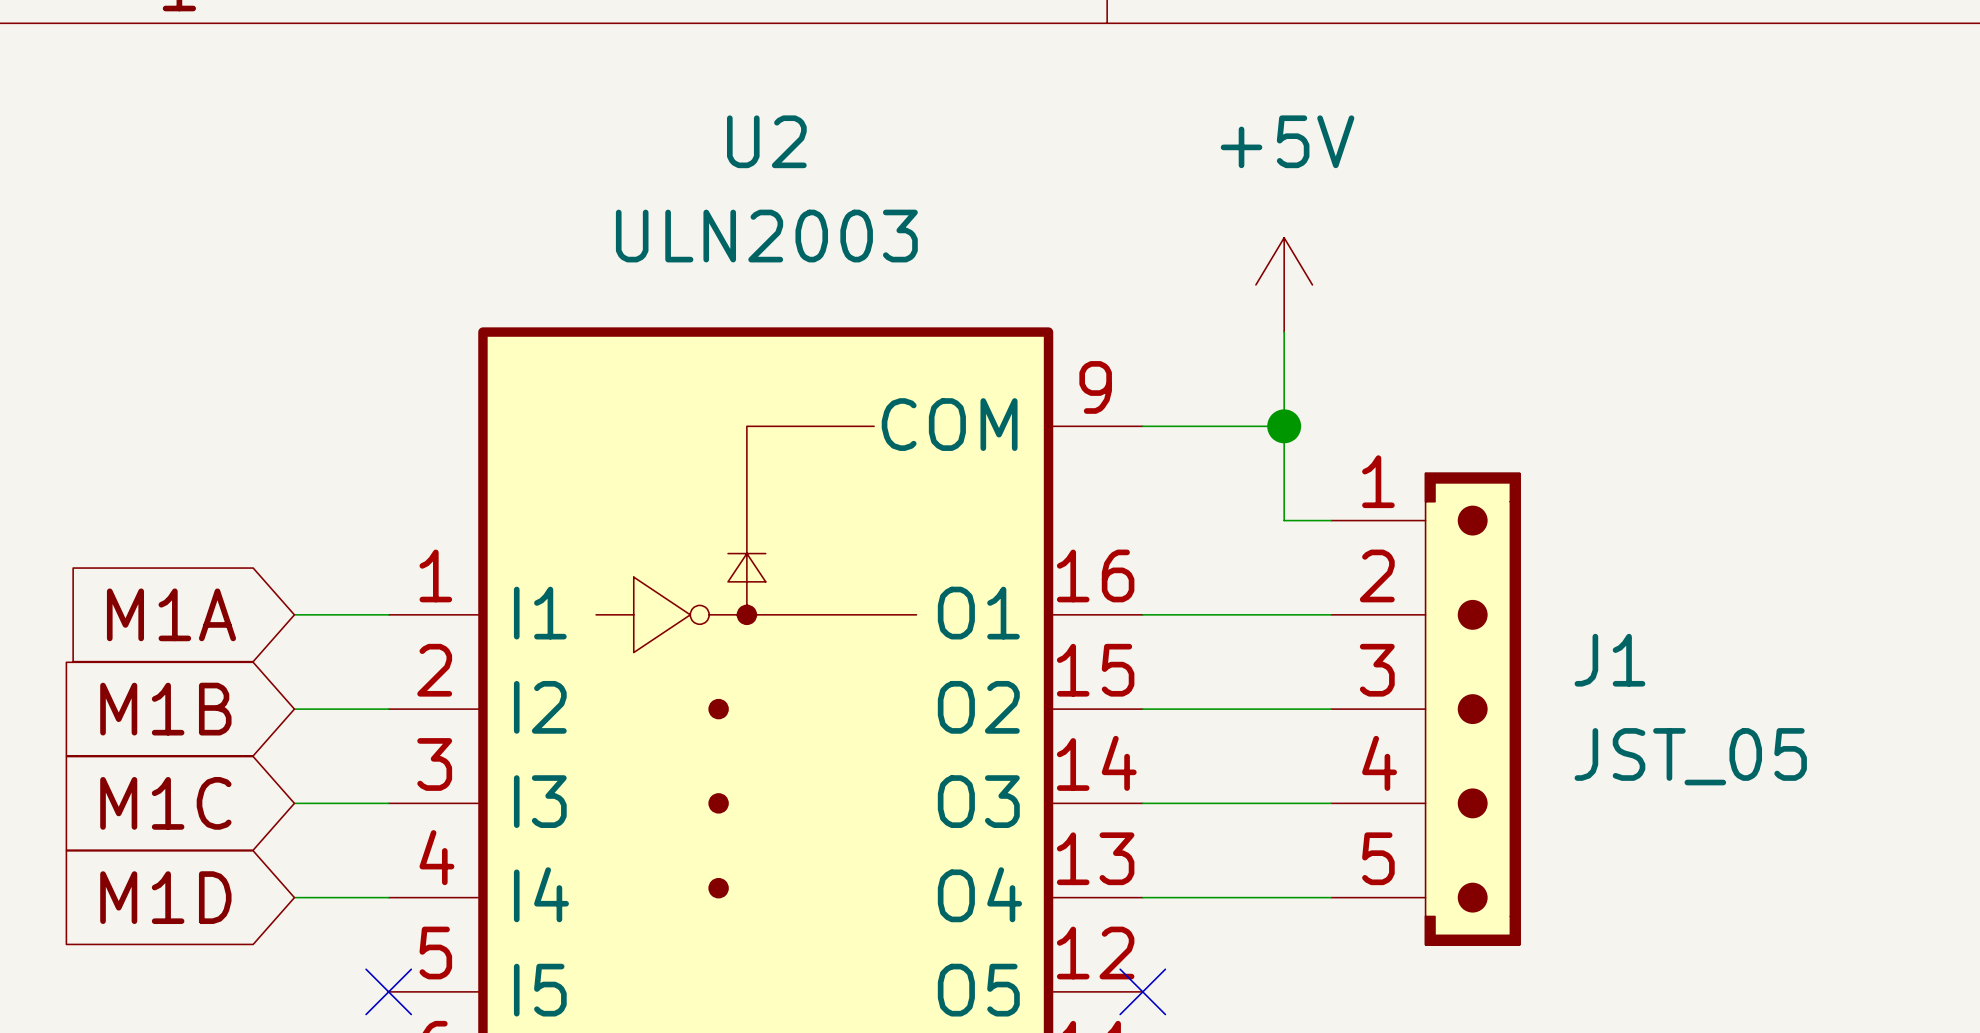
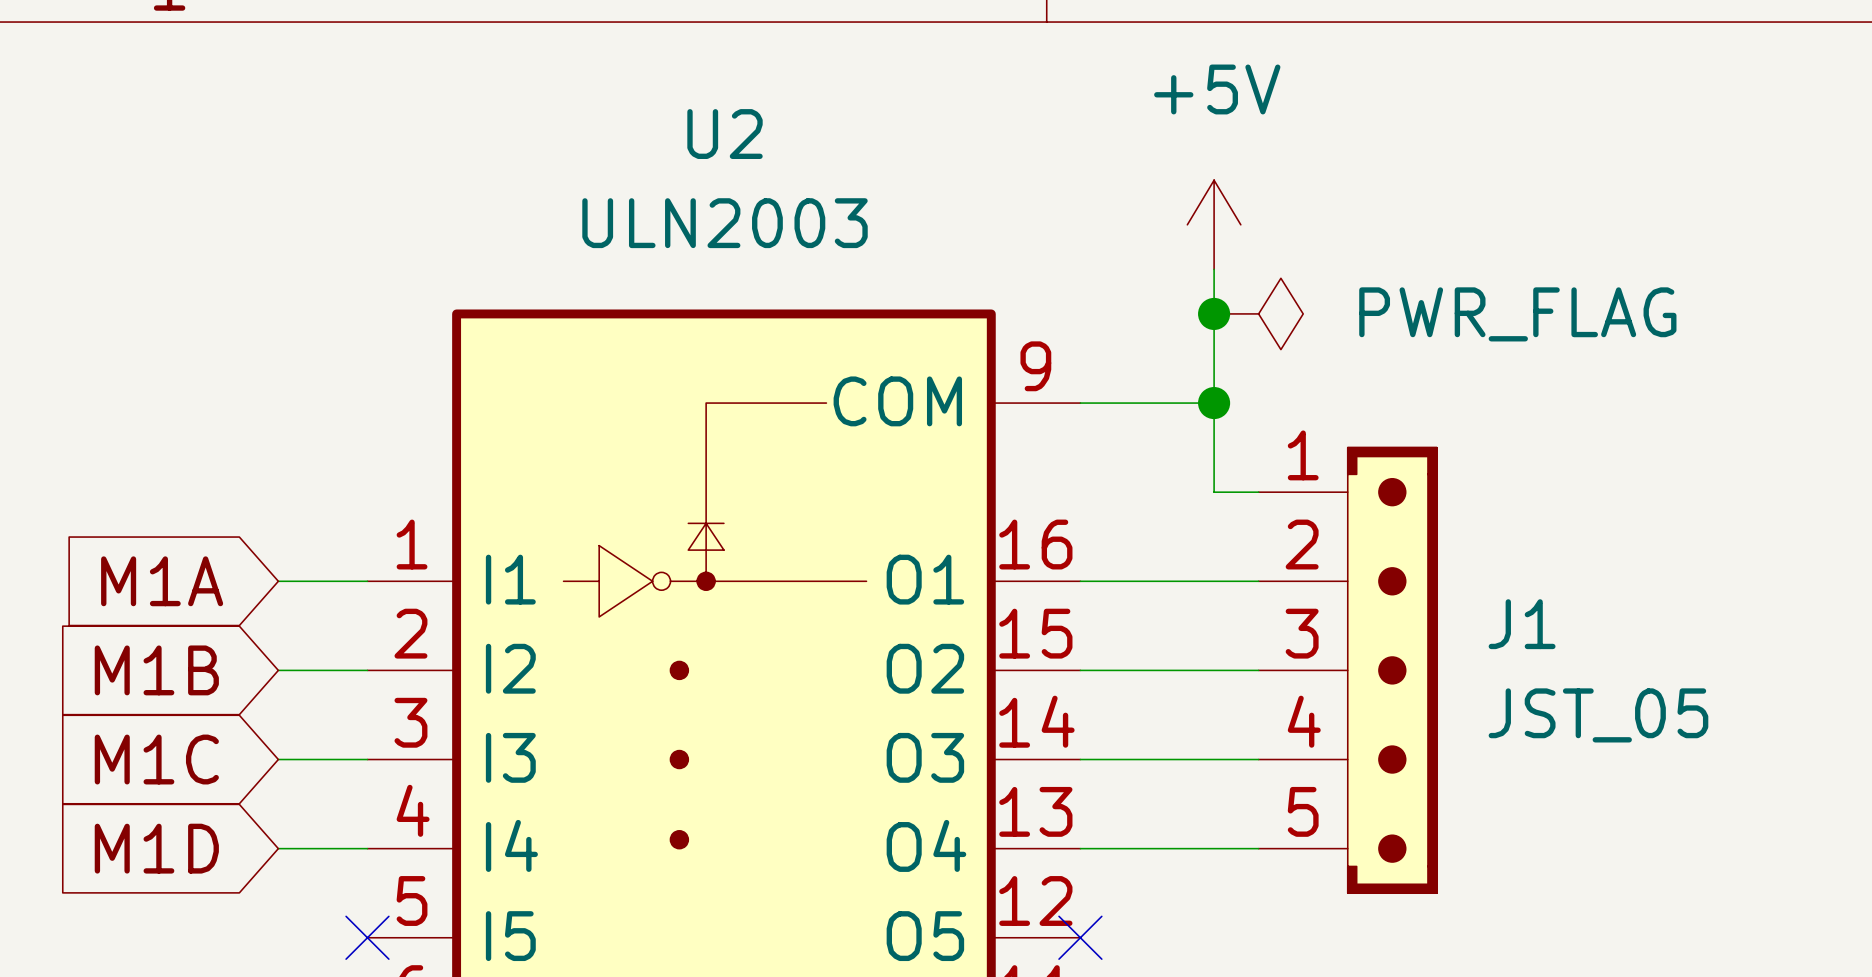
power symbol position: +5V (1284, 284) -> +5V (1214, 224)
junction: none -> (1214, 313)
power symbol: none -> PWR_FLAG (1258, 313)

